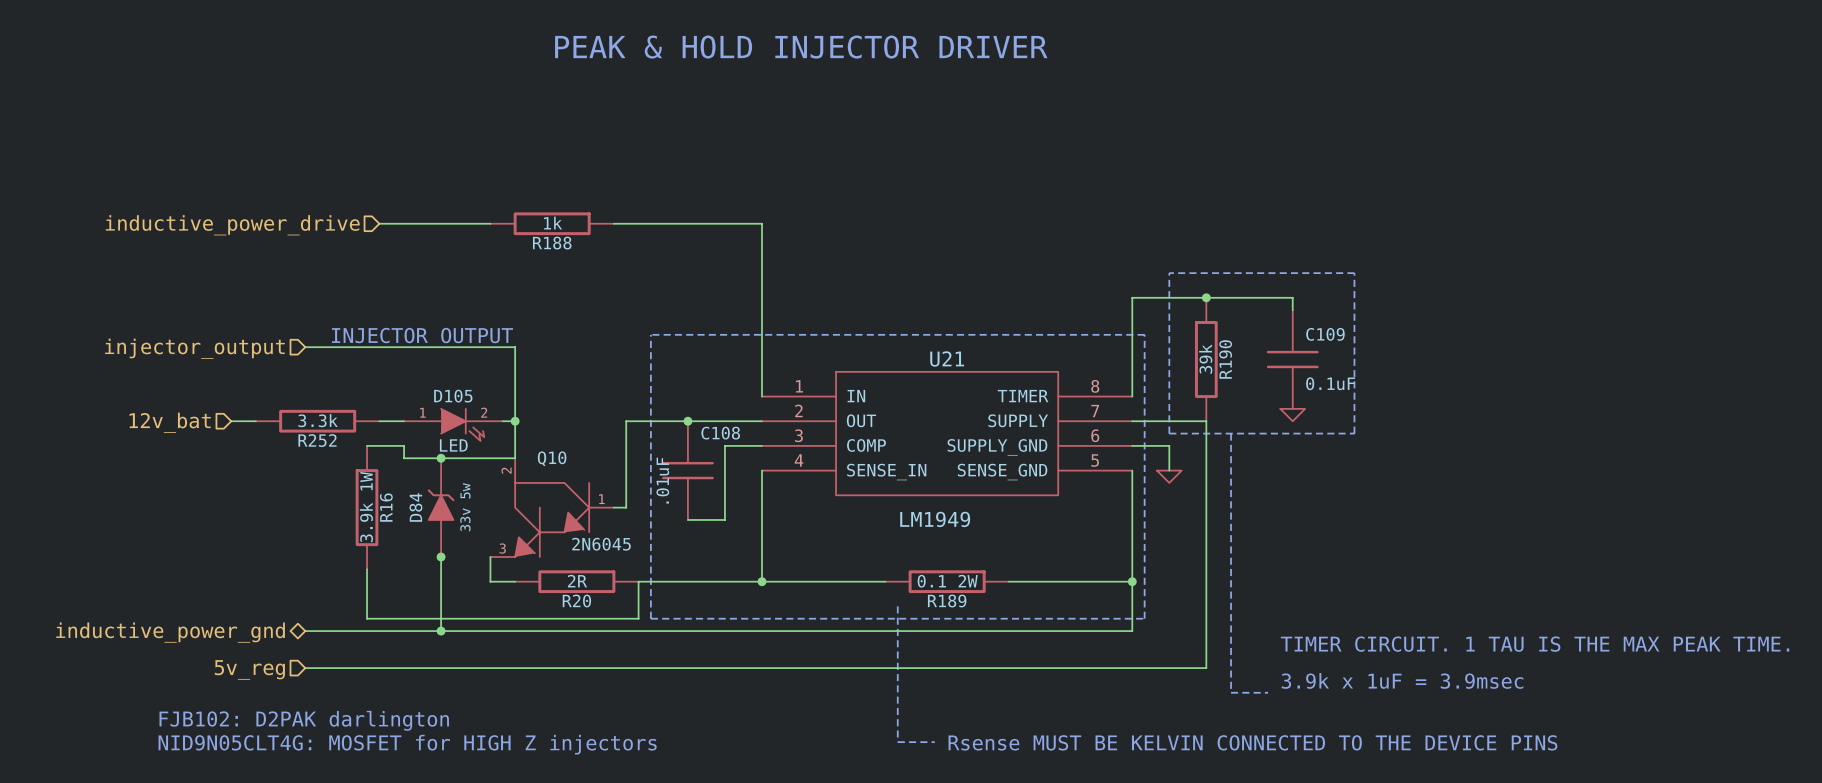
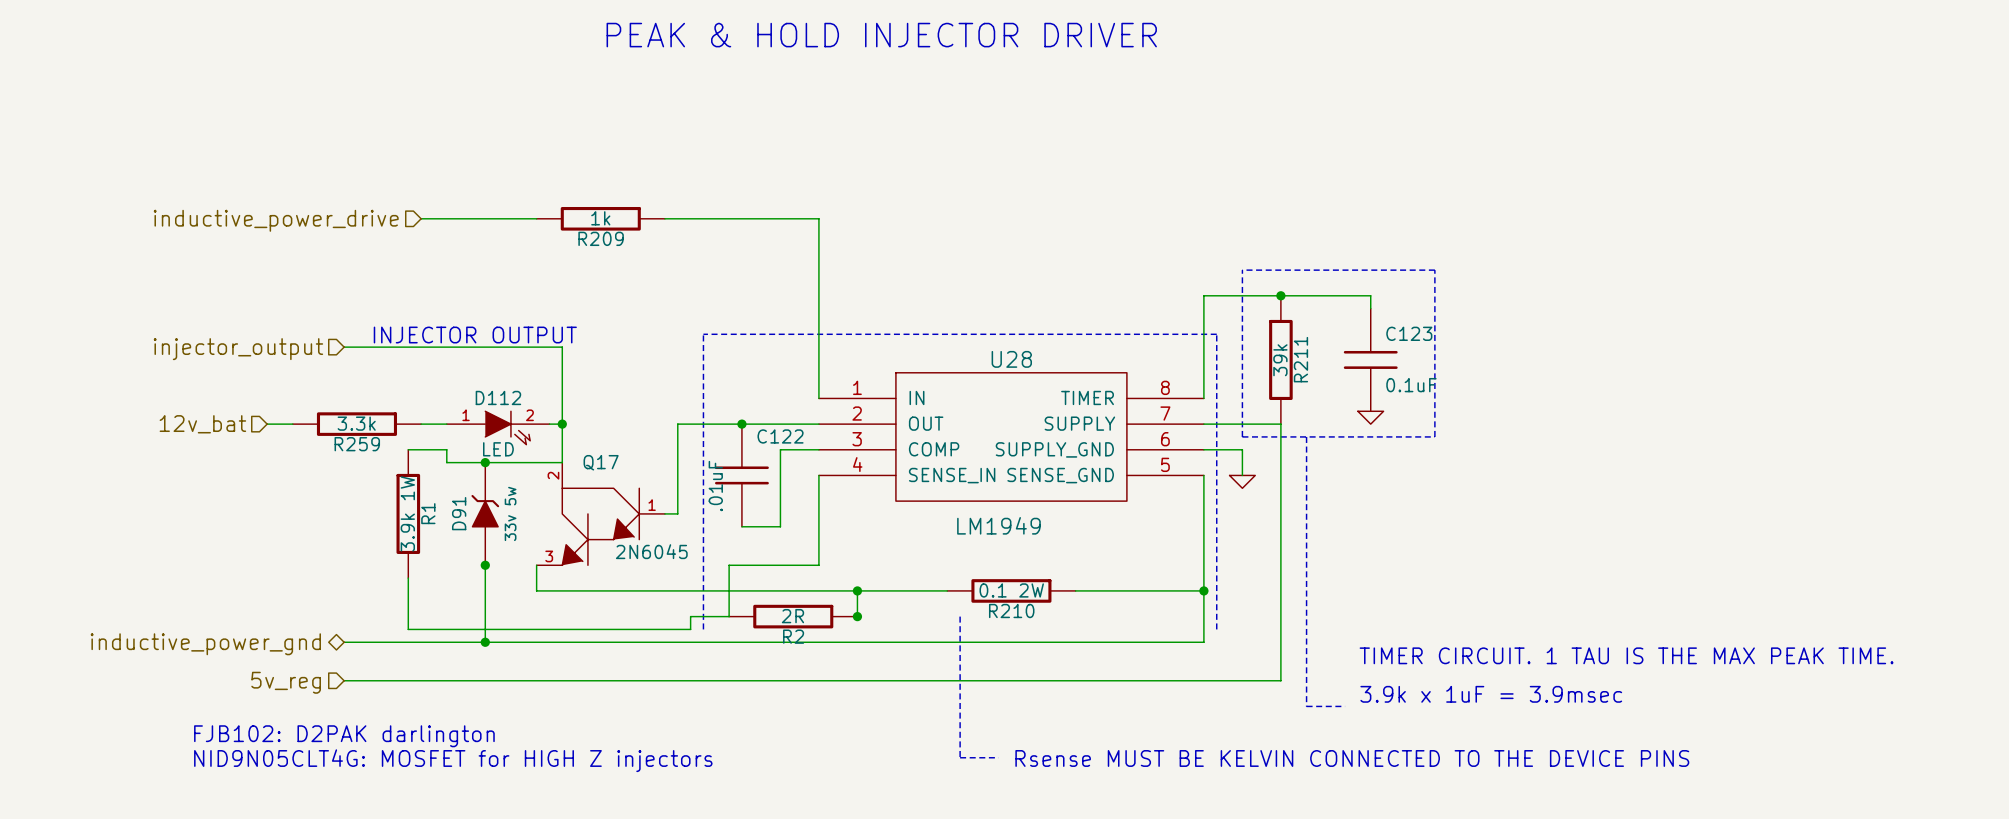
R188 name: R188 (552, 243) -> R209 (601, 238)
C109 name: C109 (1325, 334) -> C123 (1409, 333)
U21 name: U21 (947, 358) -> U28 (1011, 359)
R190 name: R190 (1225, 359) -> R211 (1300, 359)
D105 name: D105 (453, 396) -> D112 (498, 397)
C108 name: C108 (720, 433) -> C122 (780, 436)
R252 name: R252 (317, 440) -> R259 (357, 444)
Q10 name: Q10 (552, 458) -> Q17 (601, 462)
R16 name: R16 (386, 507) -> R1 (428, 513)
D84 name: D84 (415, 507) -> D91 (459, 513)
wire: (762, 557) (762, 581) -> (857, 590) (857, 616)
wire: none -> (562, 590) (690, 590)
R20: 2R (576, 581) -> none
wire: (638, 581) (638, 606) -> (818, 565) (729, 565) (729, 616) (690, 616)
junction: (762, 581) -> none
junction: none -> (857, 590)
R189 name: R189 (947, 600) -> R210 (1011, 610)
R2: none -> 2R (793, 616)
junction: none -> (857, 616)
line: (650, 618) (1144, 618) -> none

